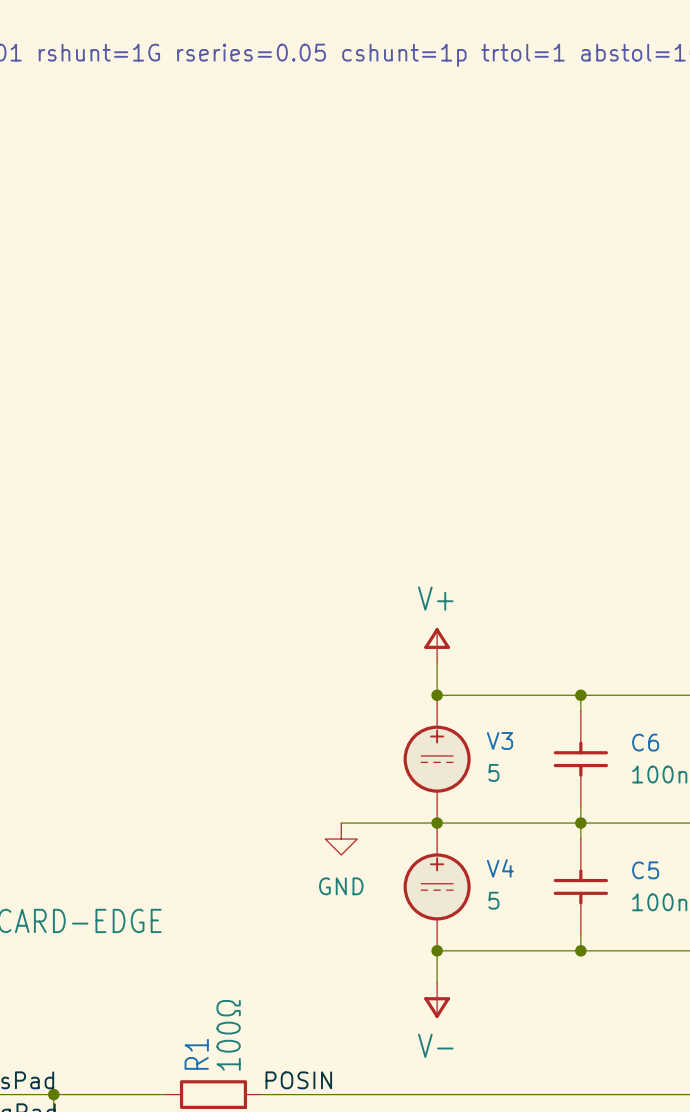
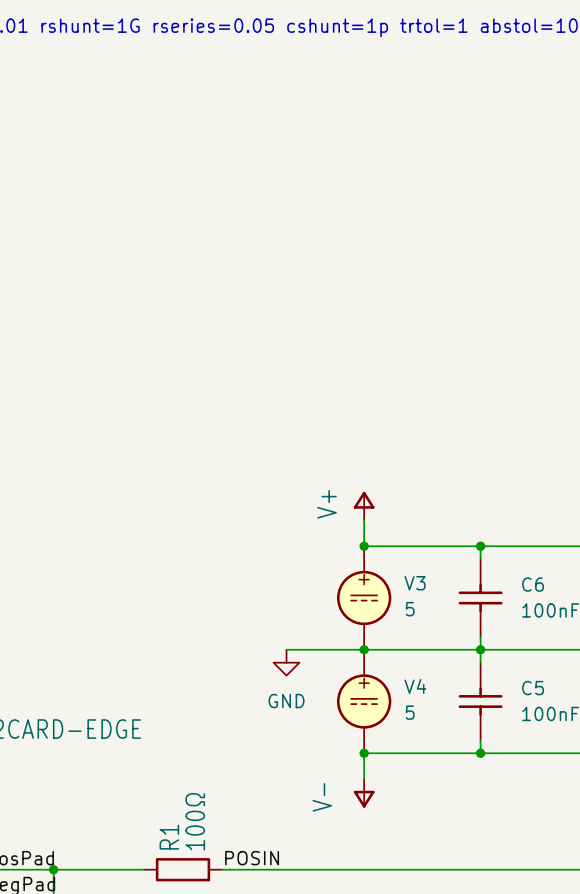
power symbol text rotation: 0° (435, 598) -> 90° counterclockwise (326, 504)
power symbol text position: V+ (435, 598) -> V+ (326, 504)
power symbol text rotation: 0° (435, 1045) -> 90° counterclockwise (322, 797)
power symbol text position: V- (435, 1045) -> V- (322, 797)

